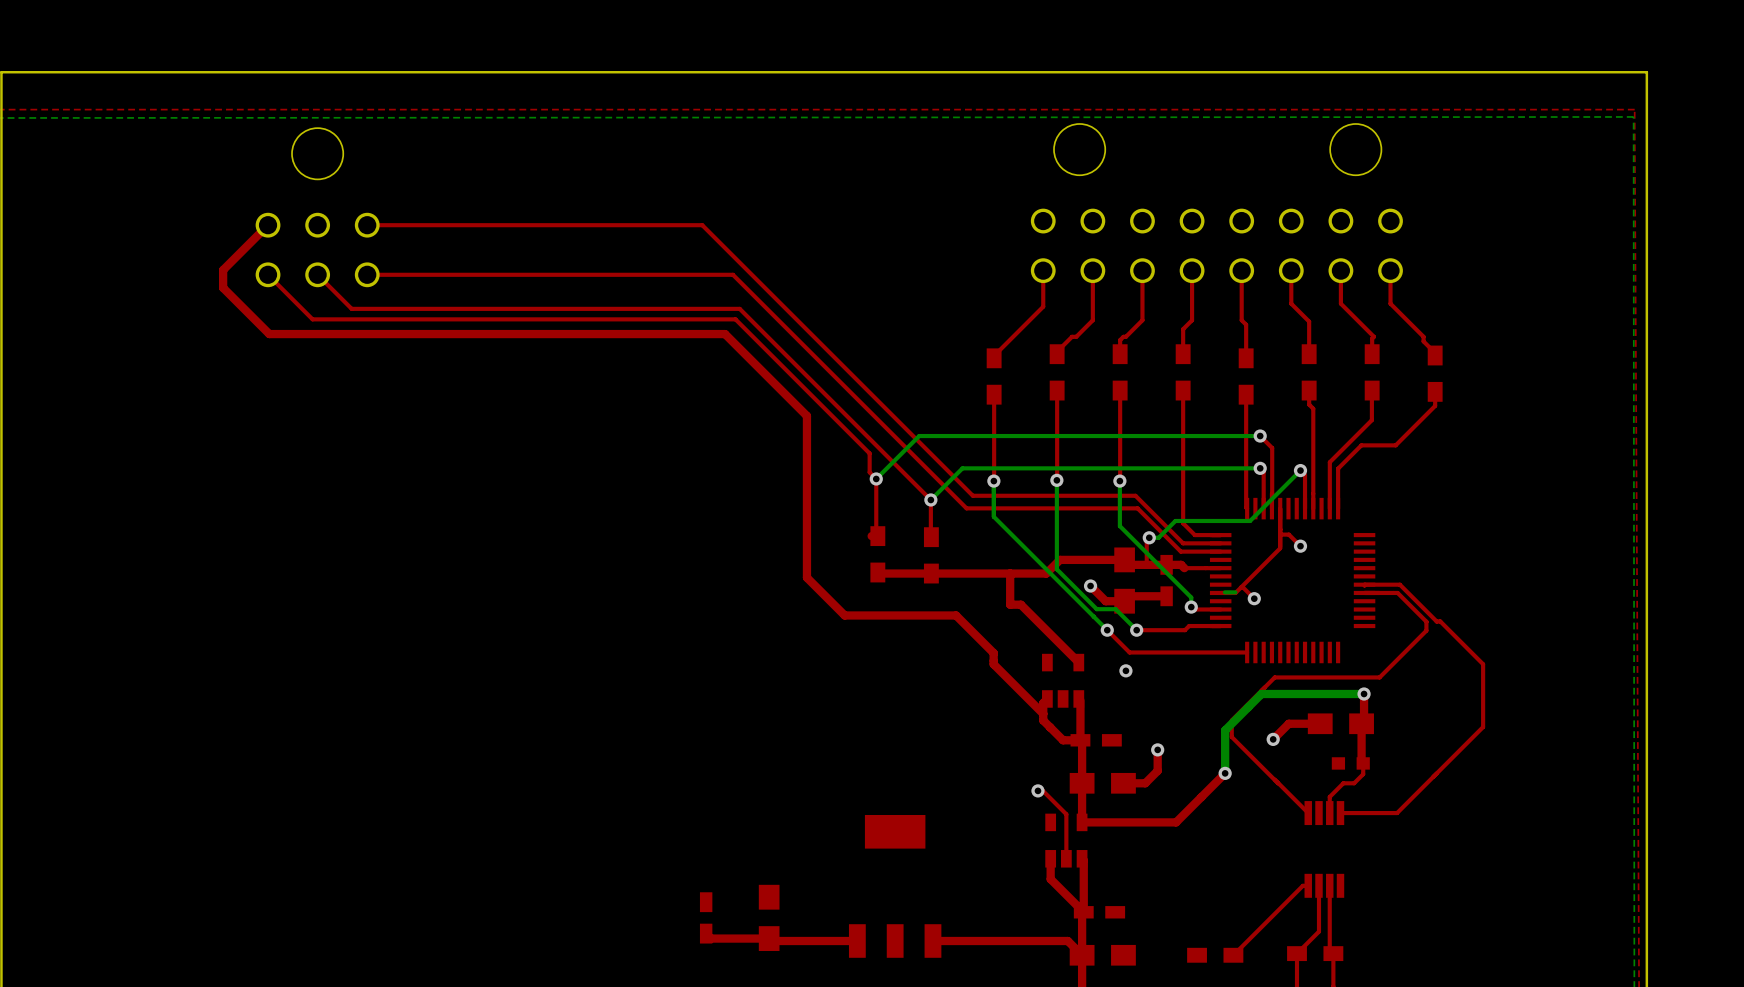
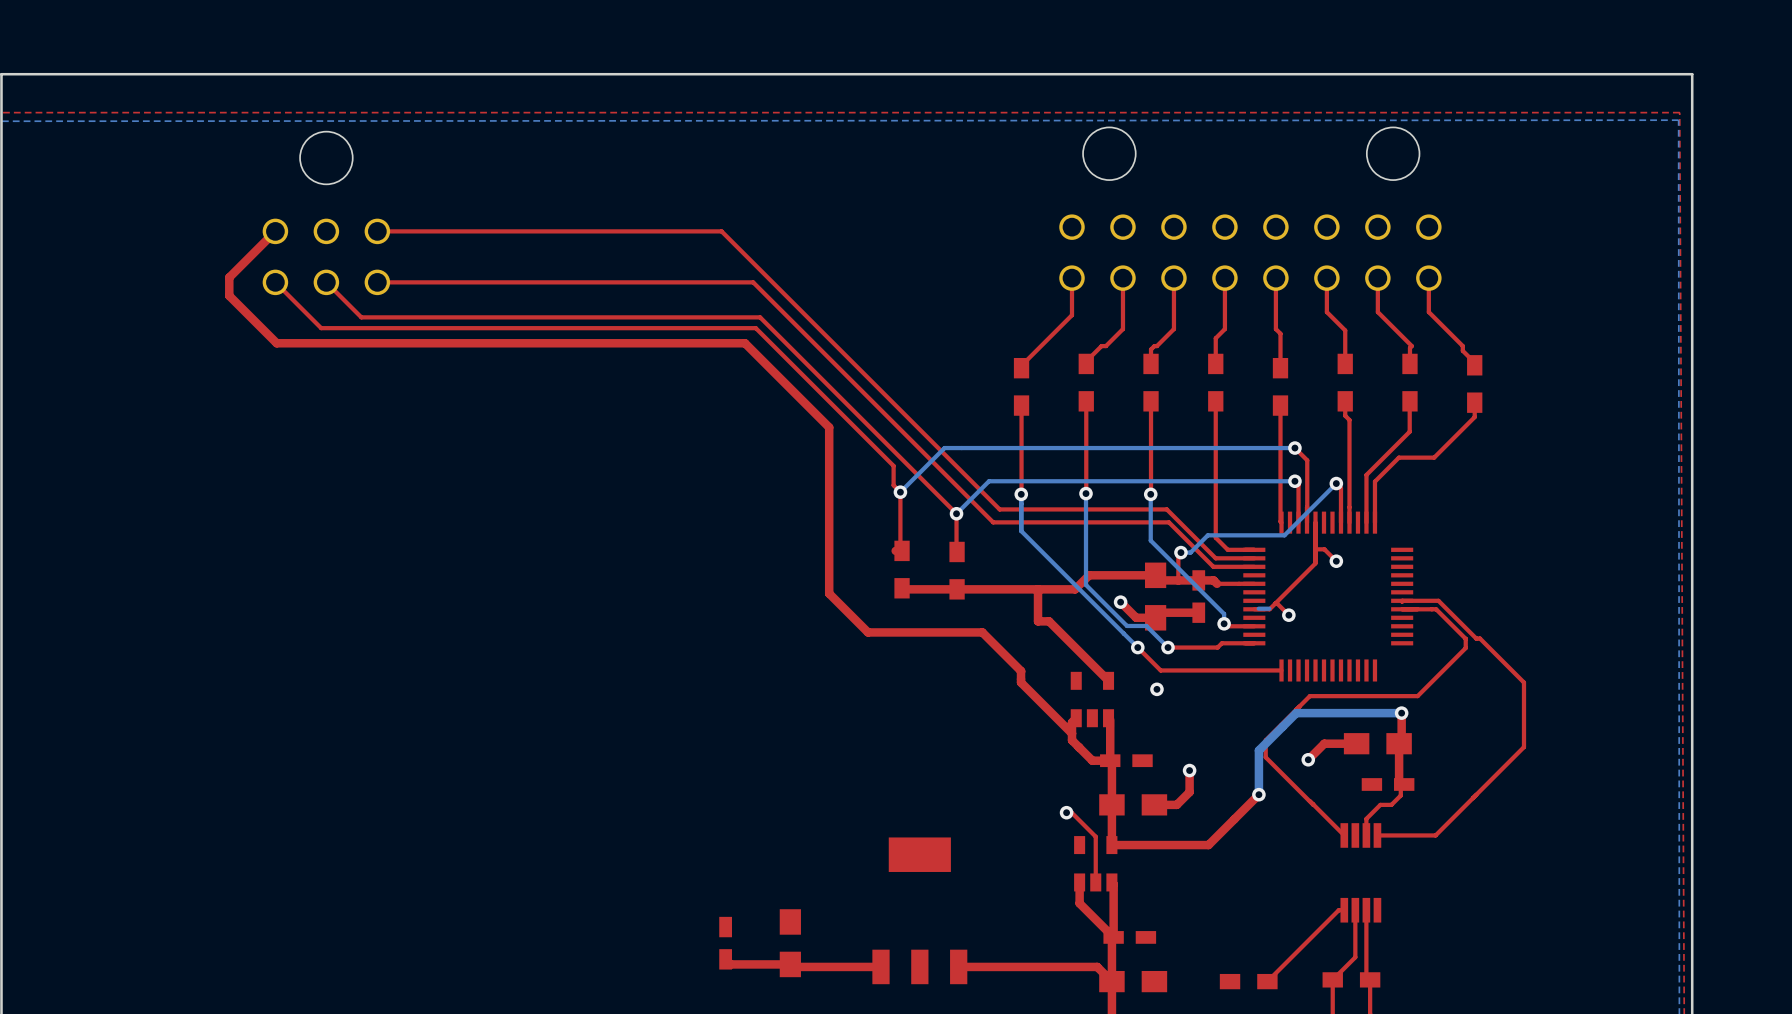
part footprint: [1331, 757, 1370, 770] -> [1361, 778, 1415, 791]

